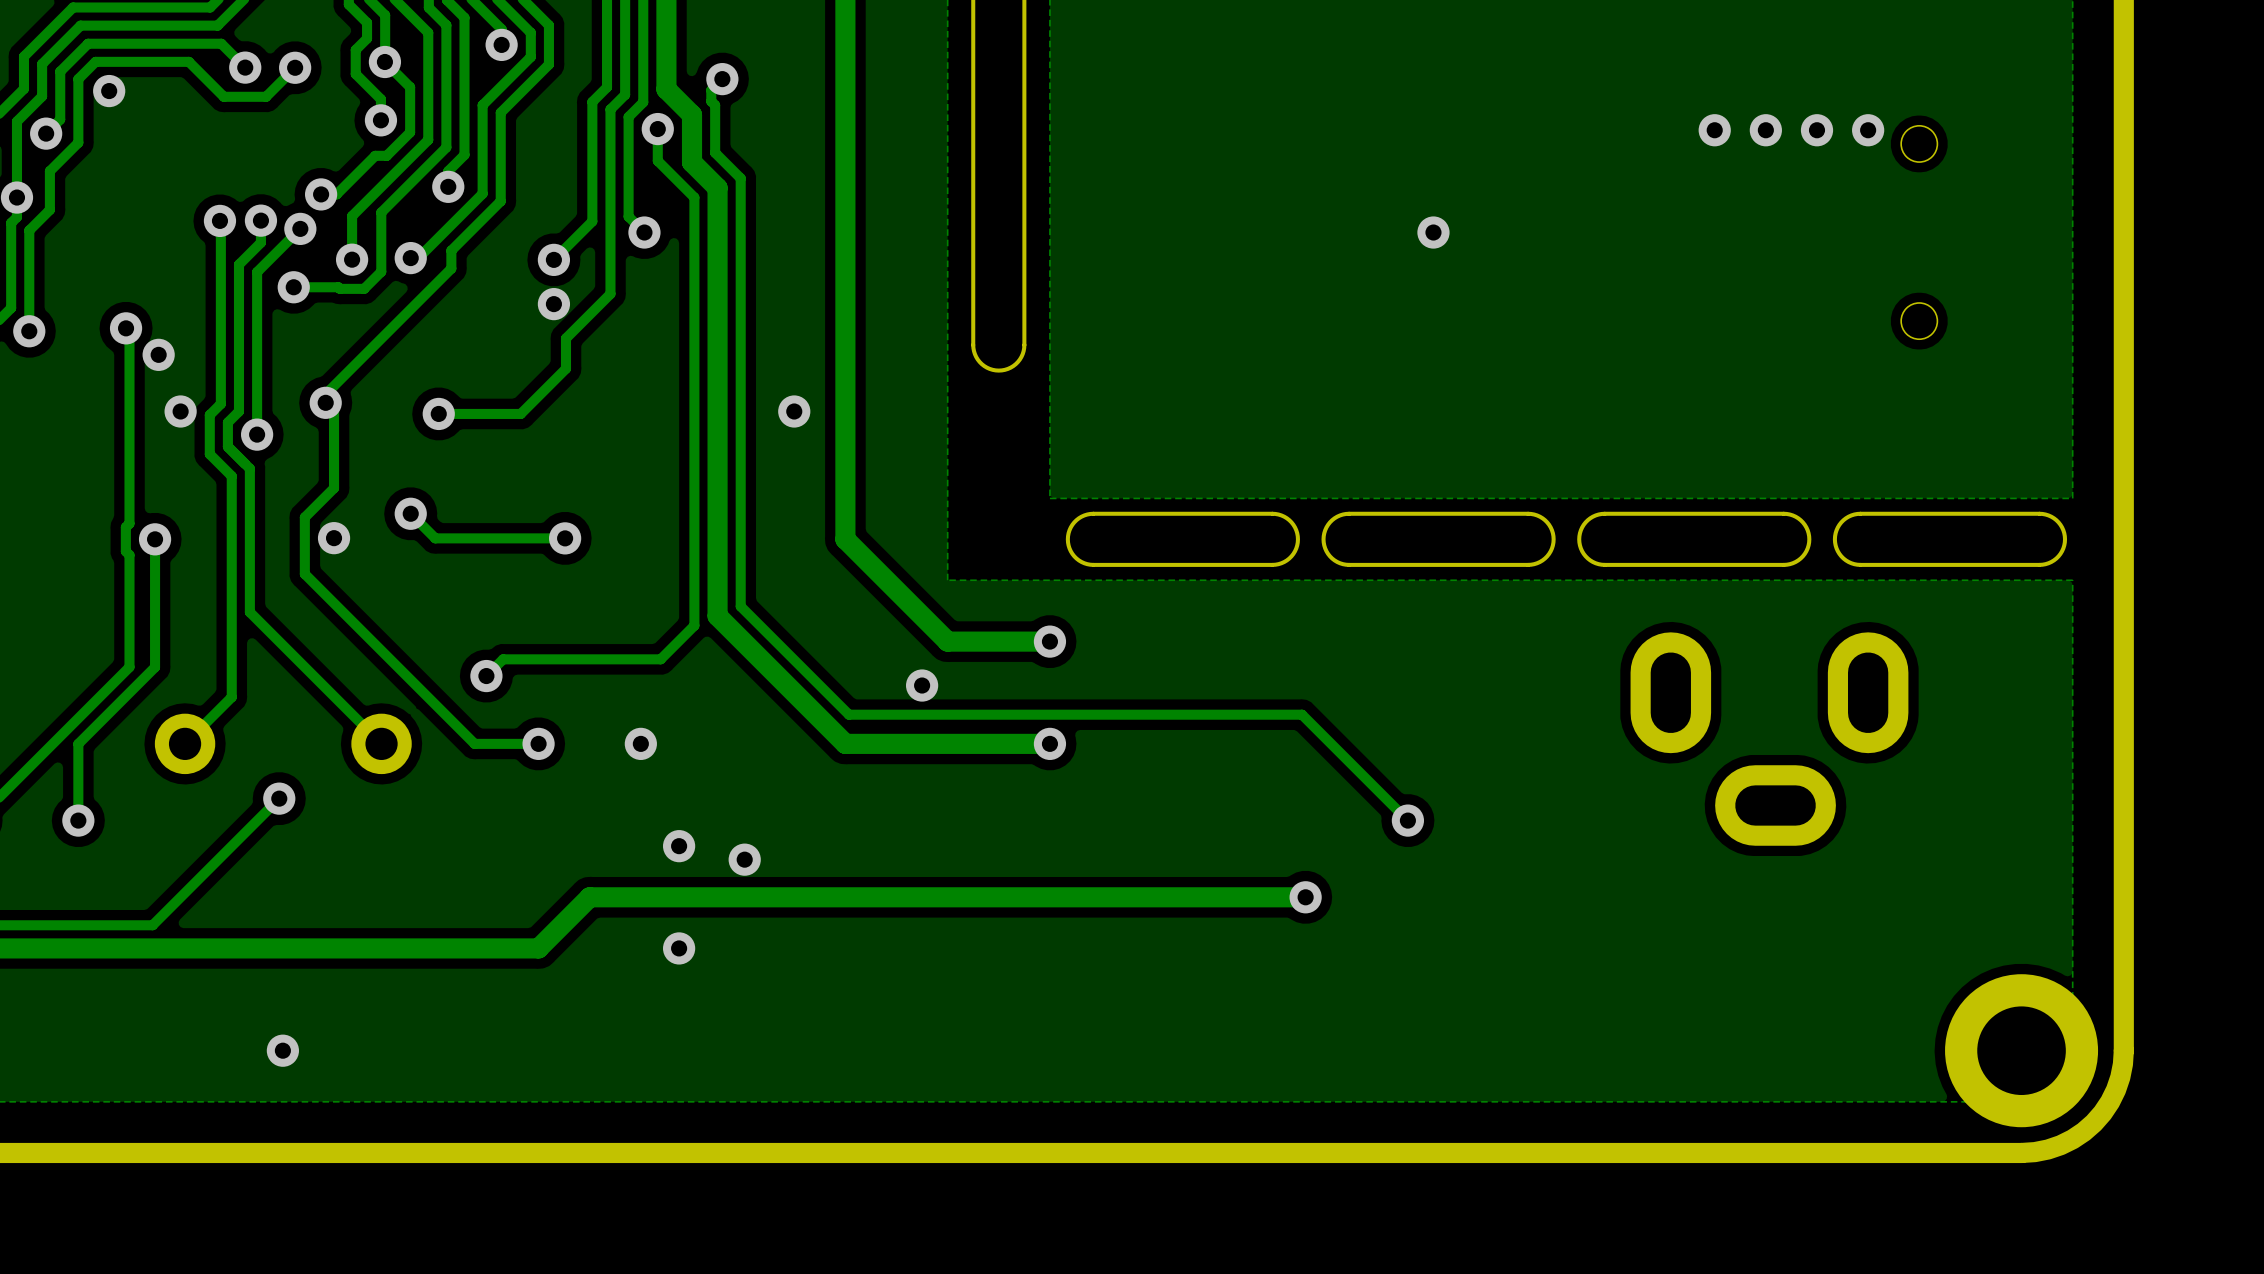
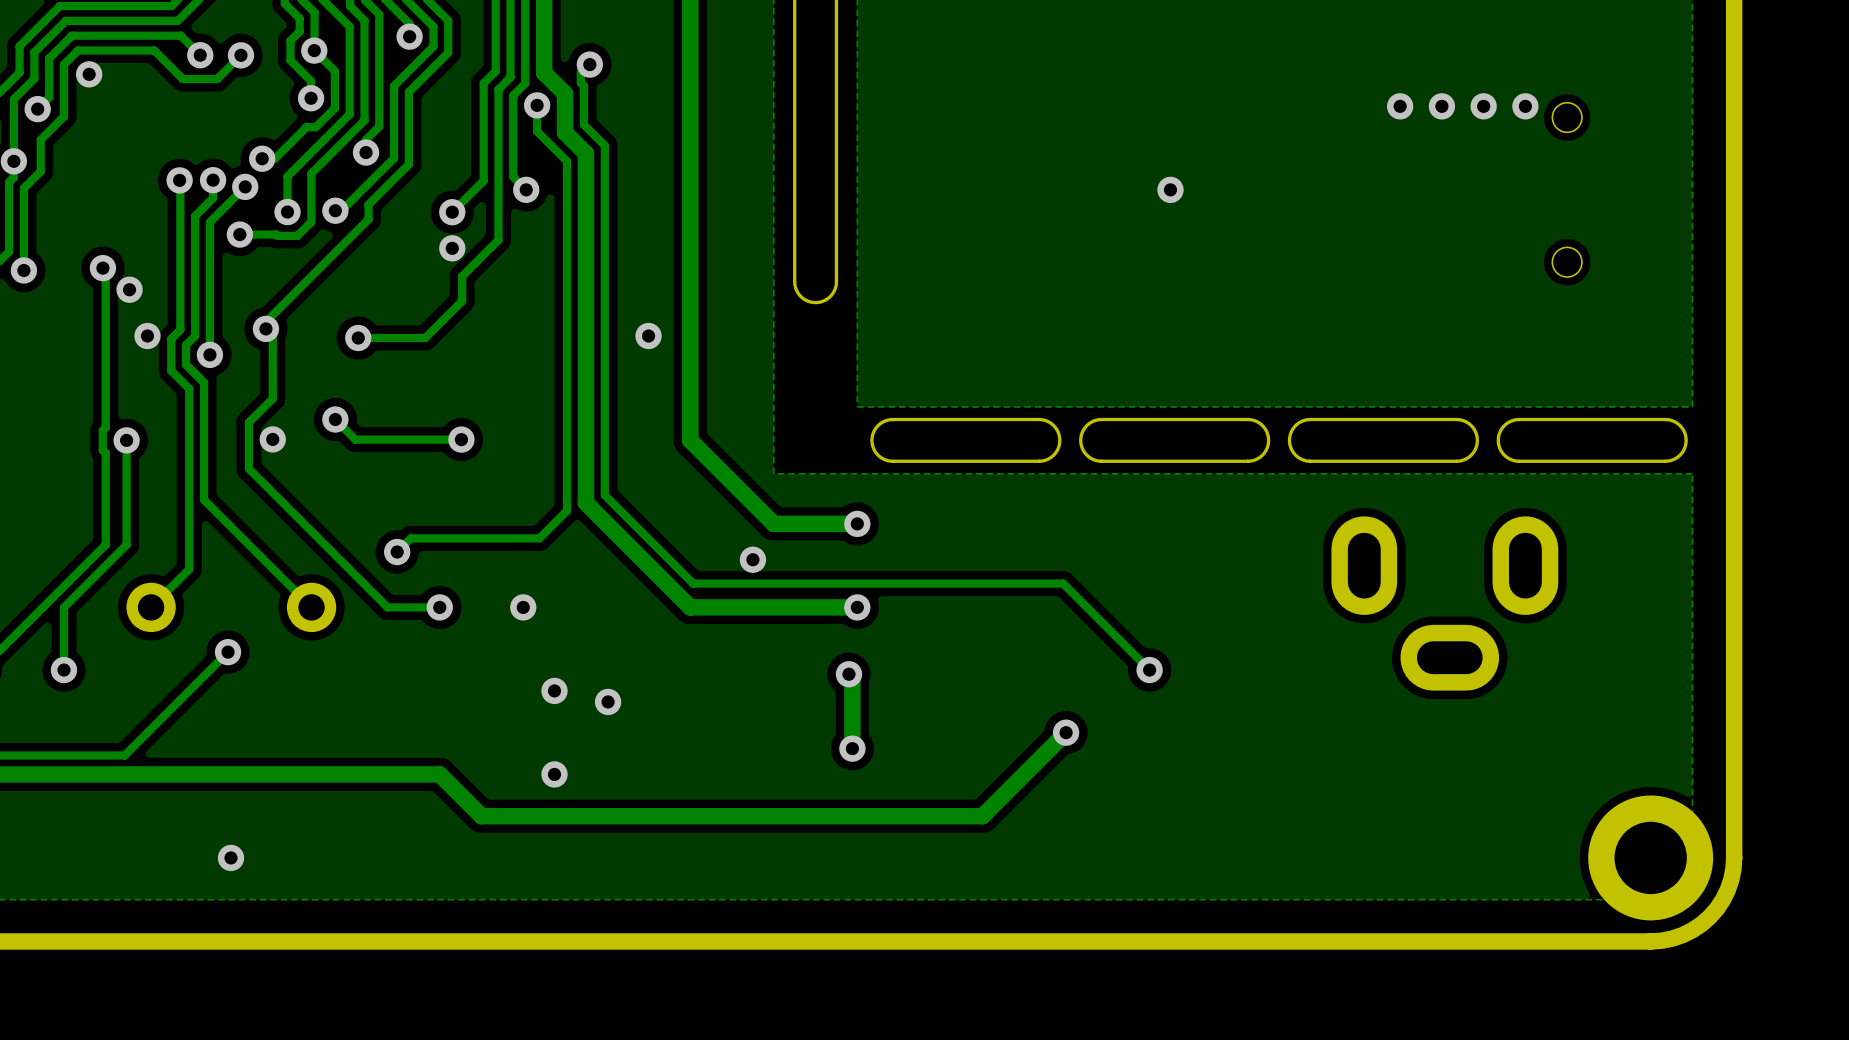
track: none -> (848, 674) (852, 677) (852, 748)
via: none -> (848, 674)
track: (1305, 897) (589, 897) (538, 948) -> (1066, 732) (982, 816) (481, 816) (439, 774)
via: none -> (852, 748)

